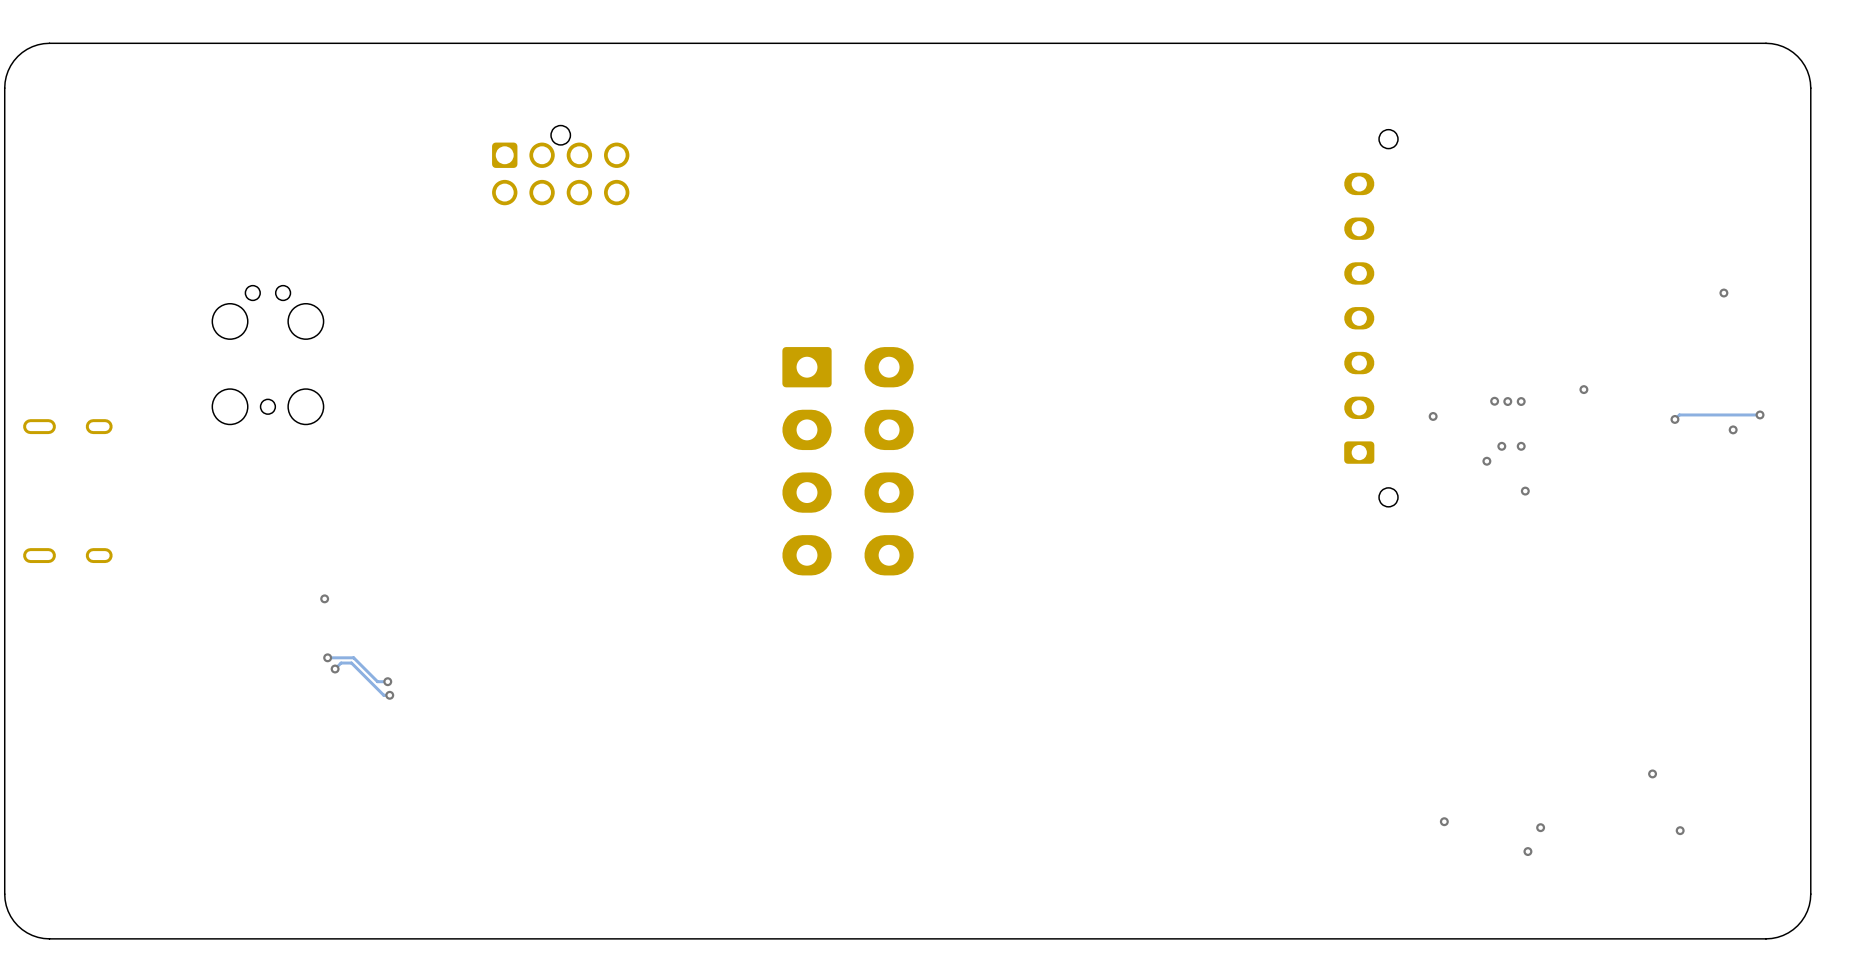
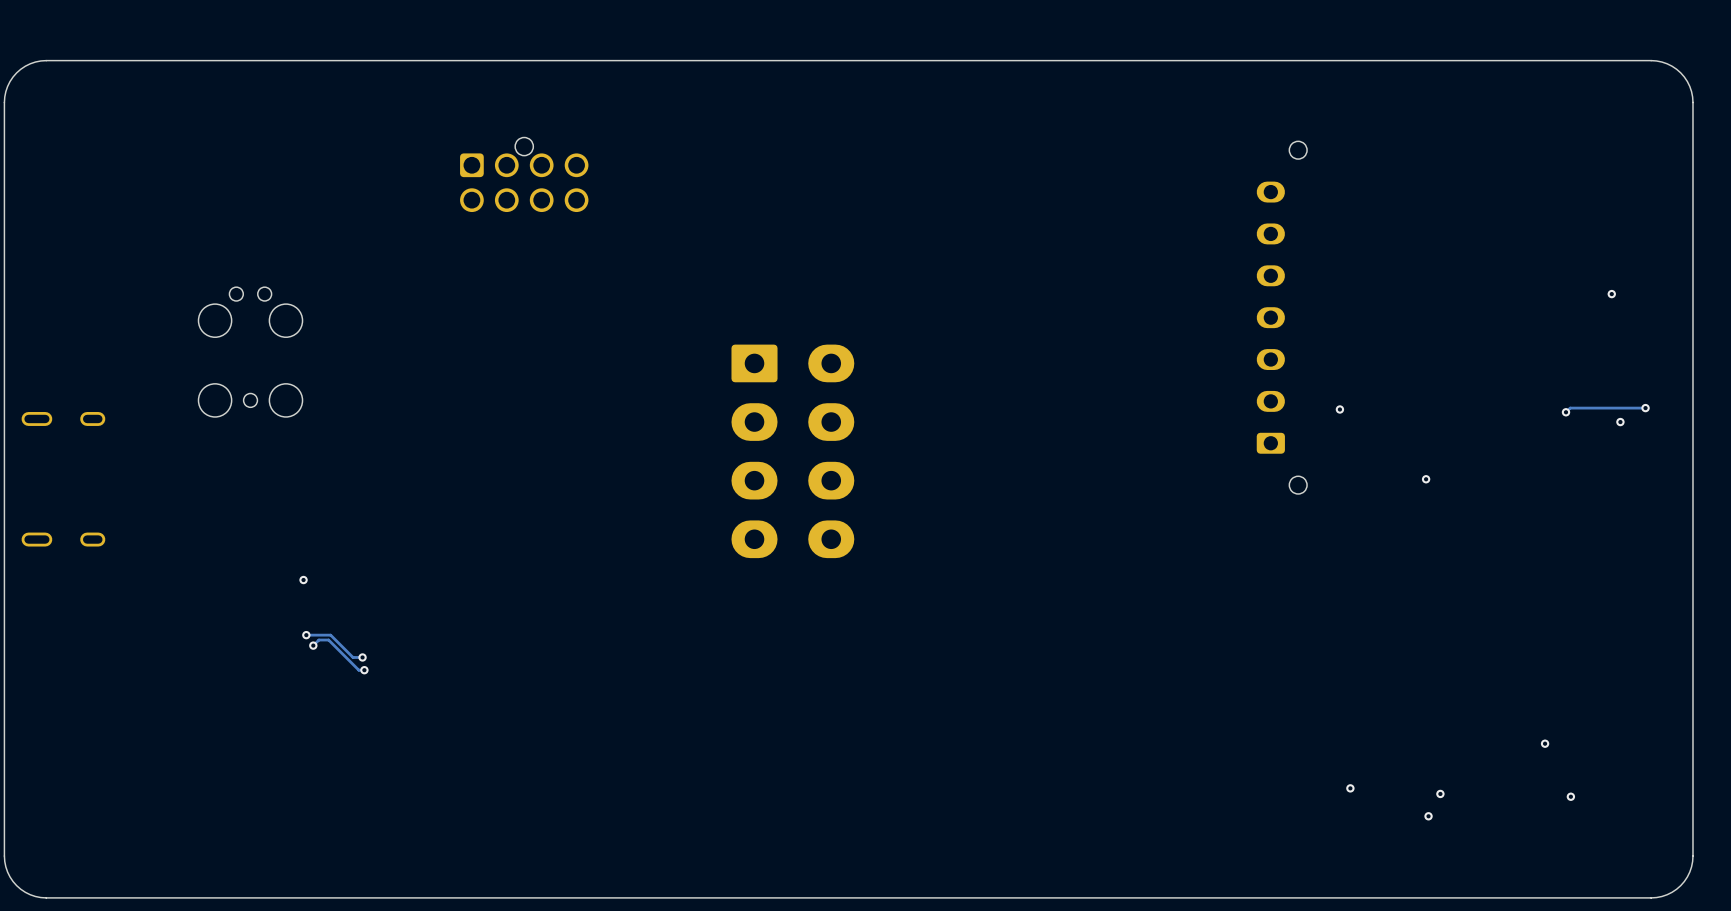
via: (1583, 389) -> none
via: (1494, 401) -> none
via: (1507, 401) -> none
via: (1521, 401) -> none
via: (1501, 446) -> none
via: (1521, 446) -> none
via: (1486, 461) -> none

